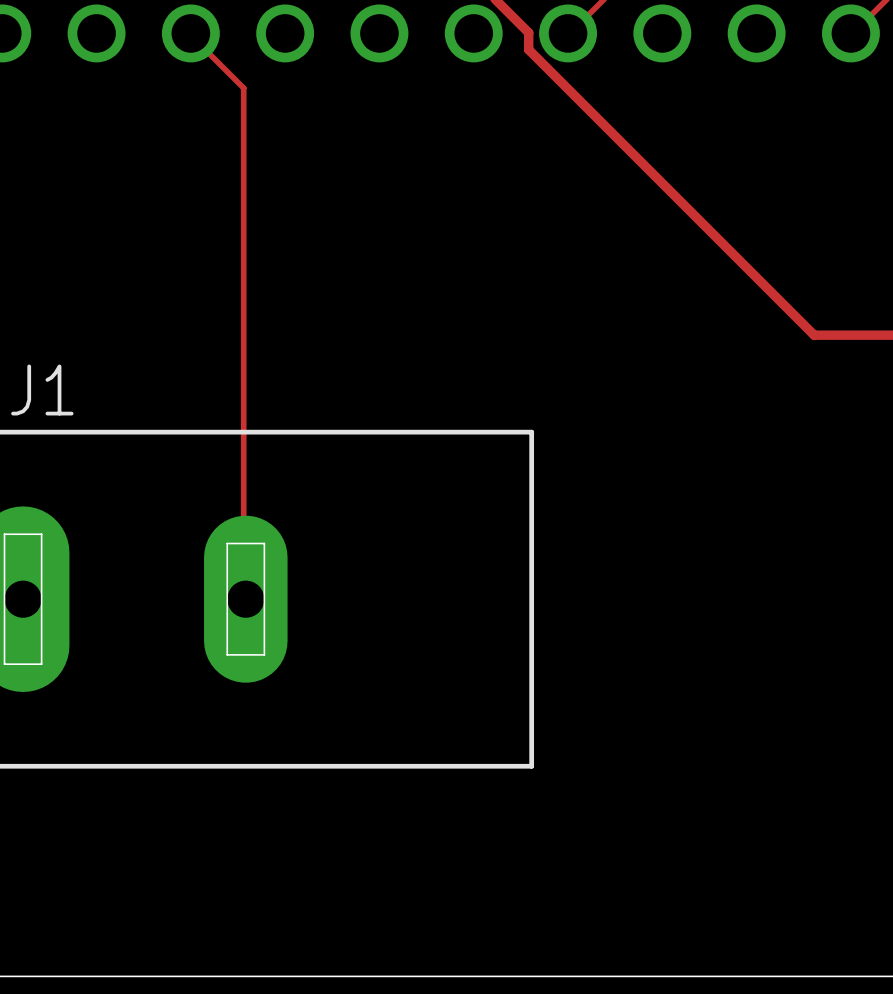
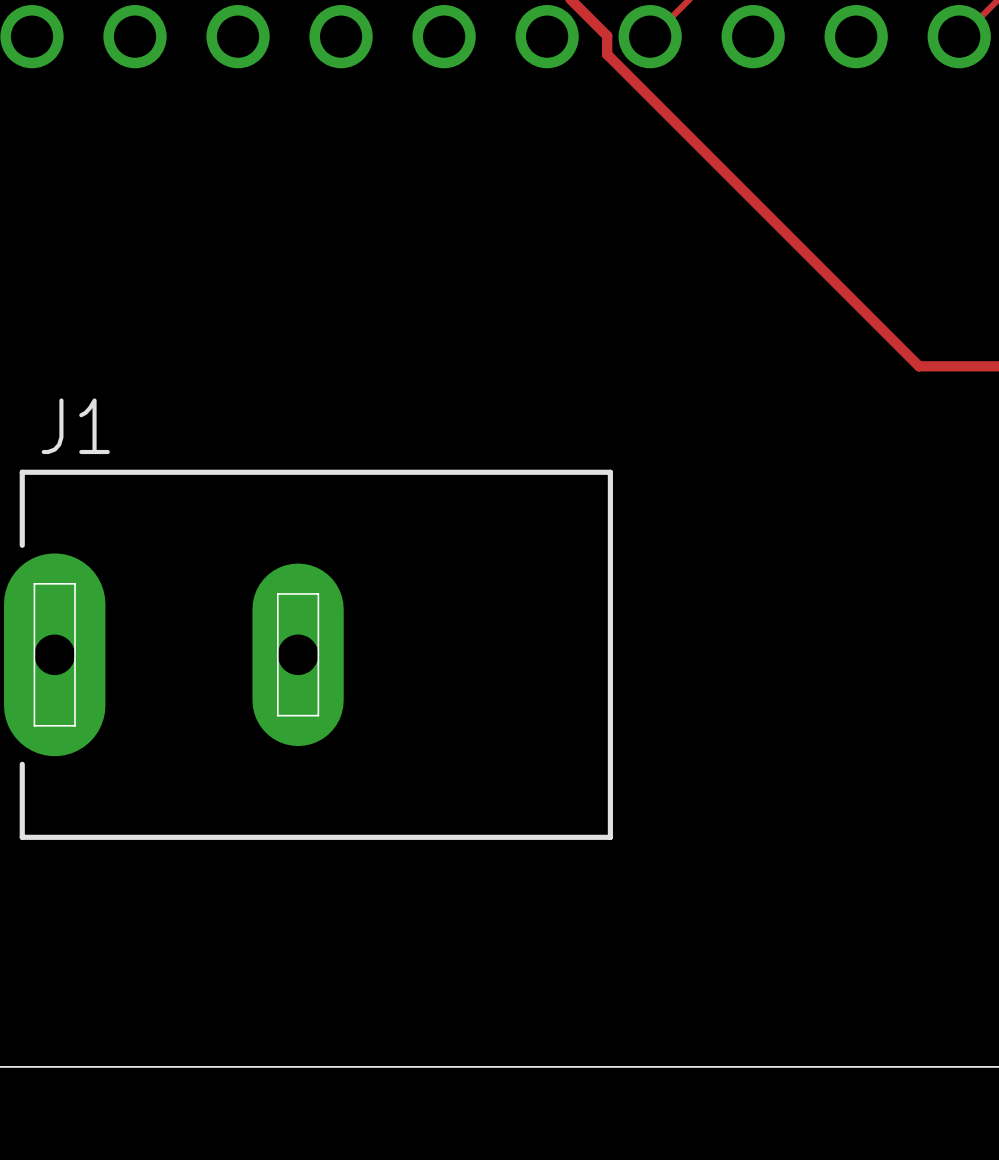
track: (192, 37) (243, 88) (243, 597) -> none

